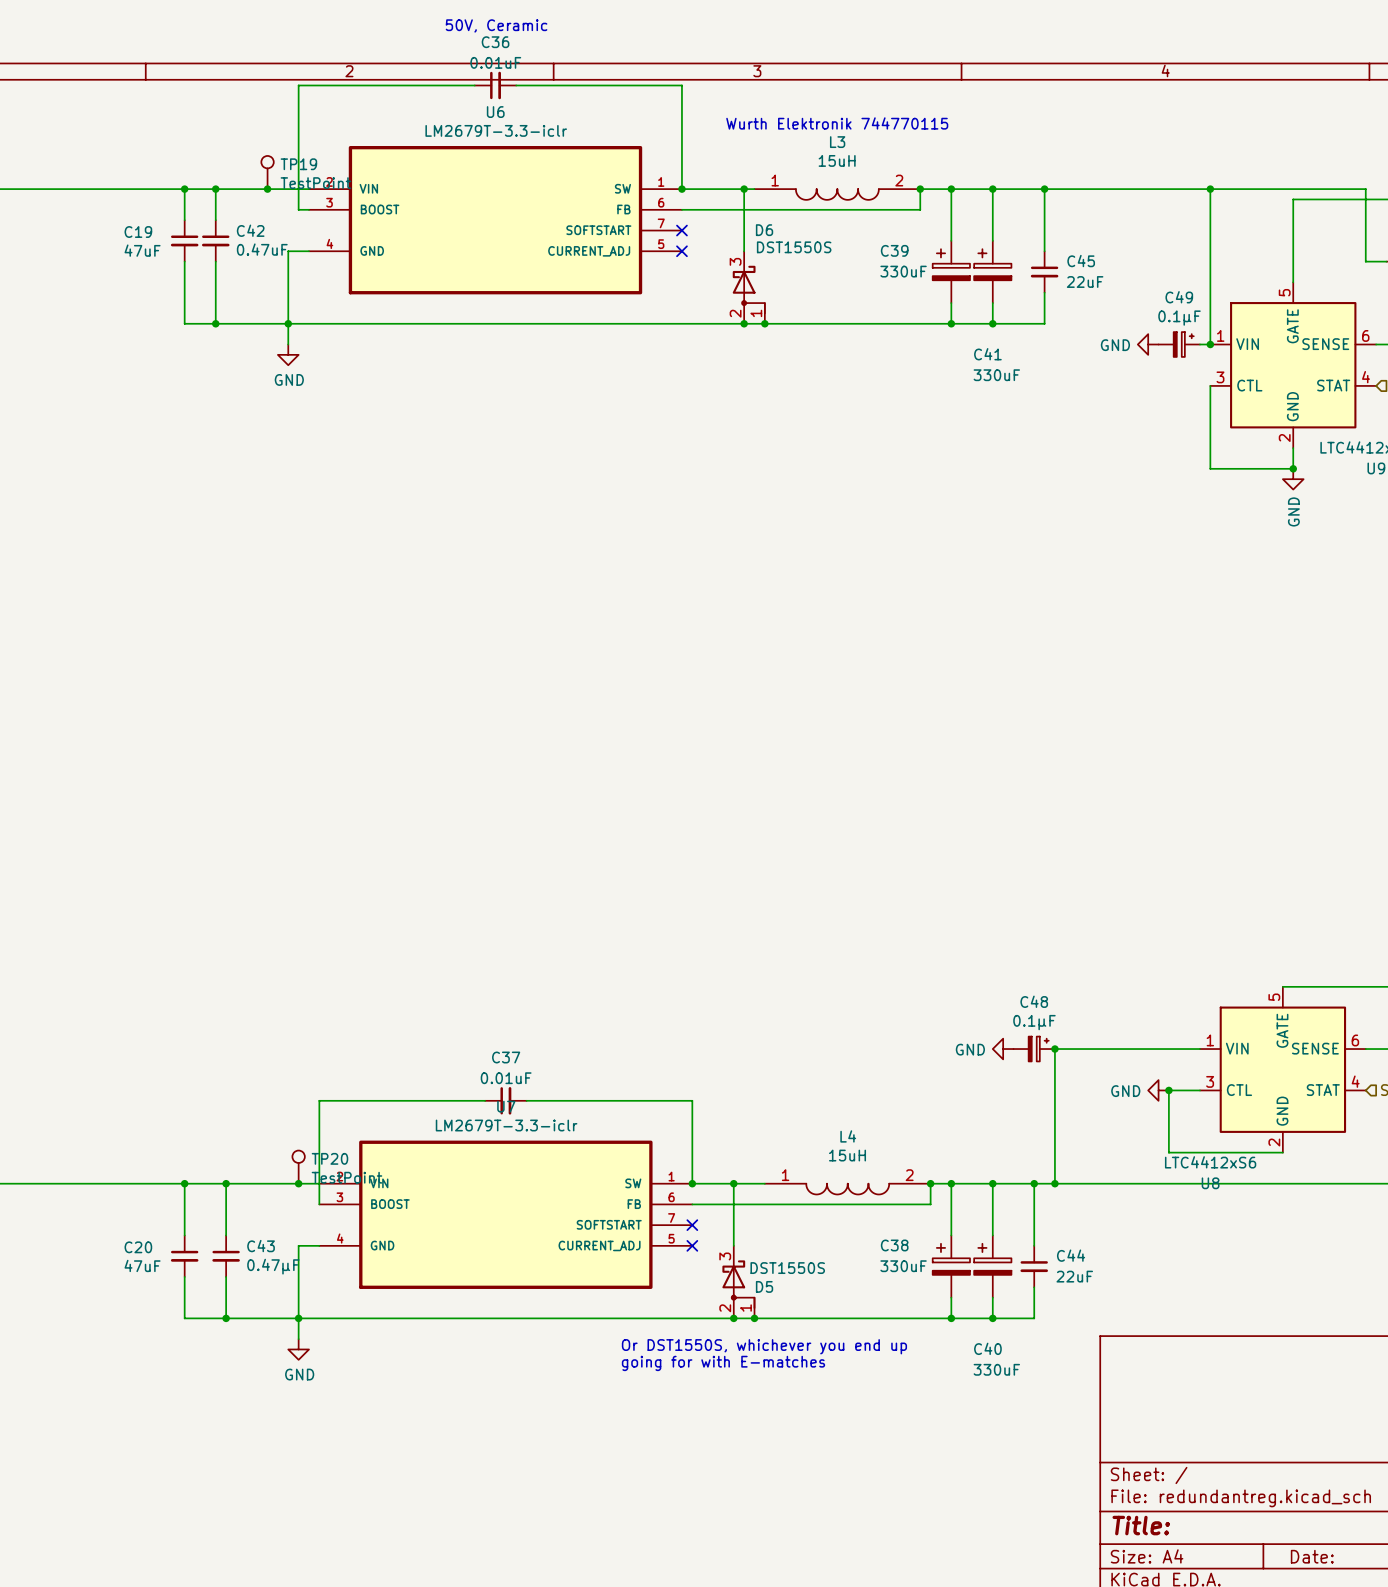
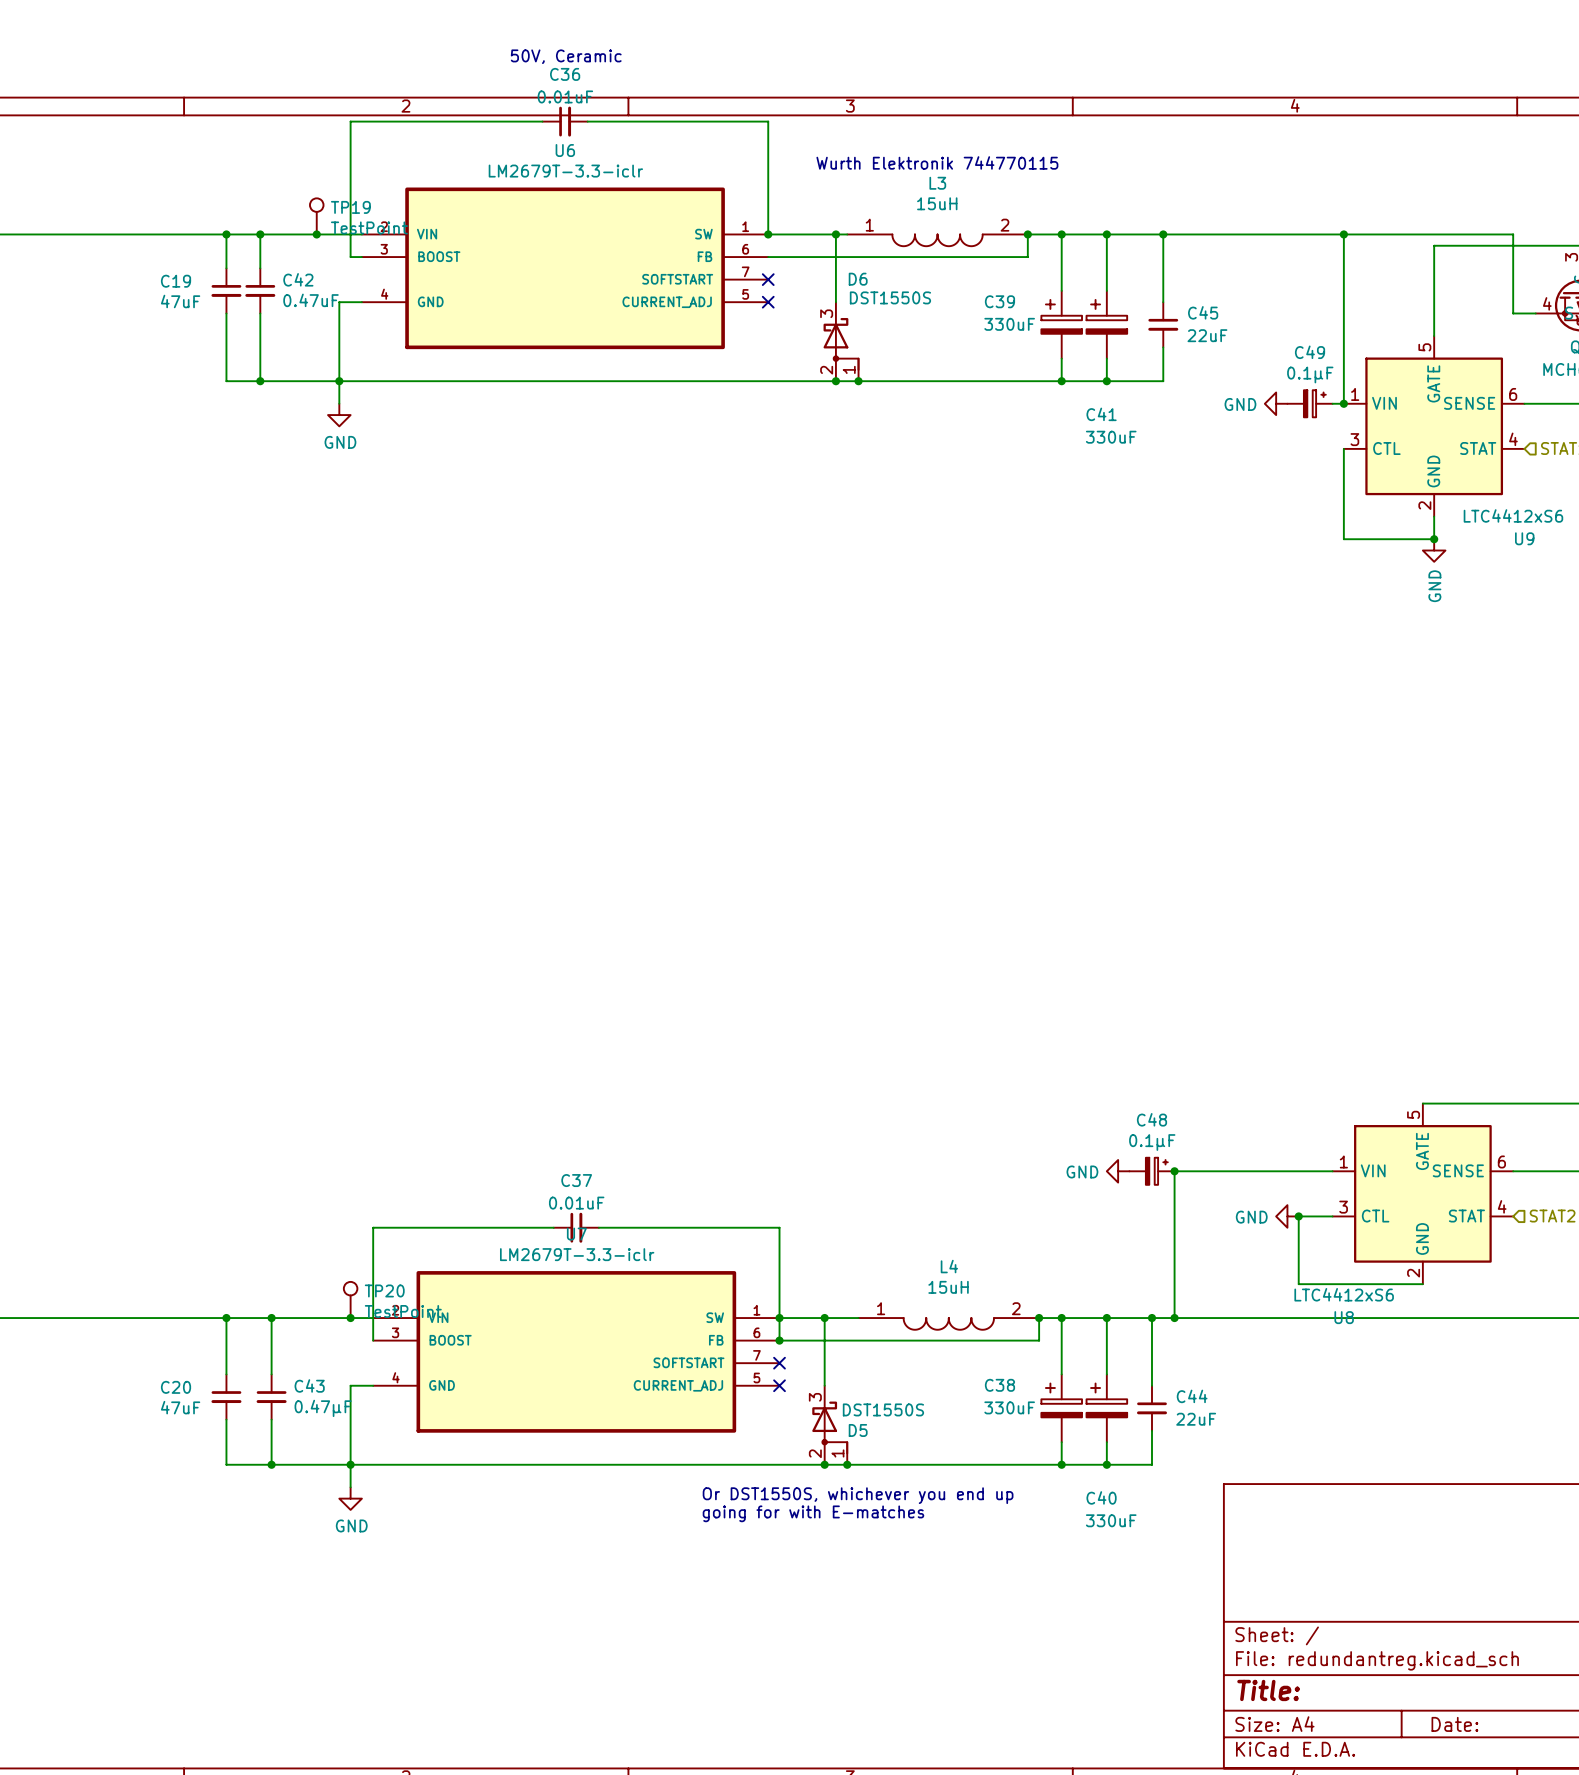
wire: none -> (779, 1318) (779, 1340)
junction: none -> (779, 1340)

